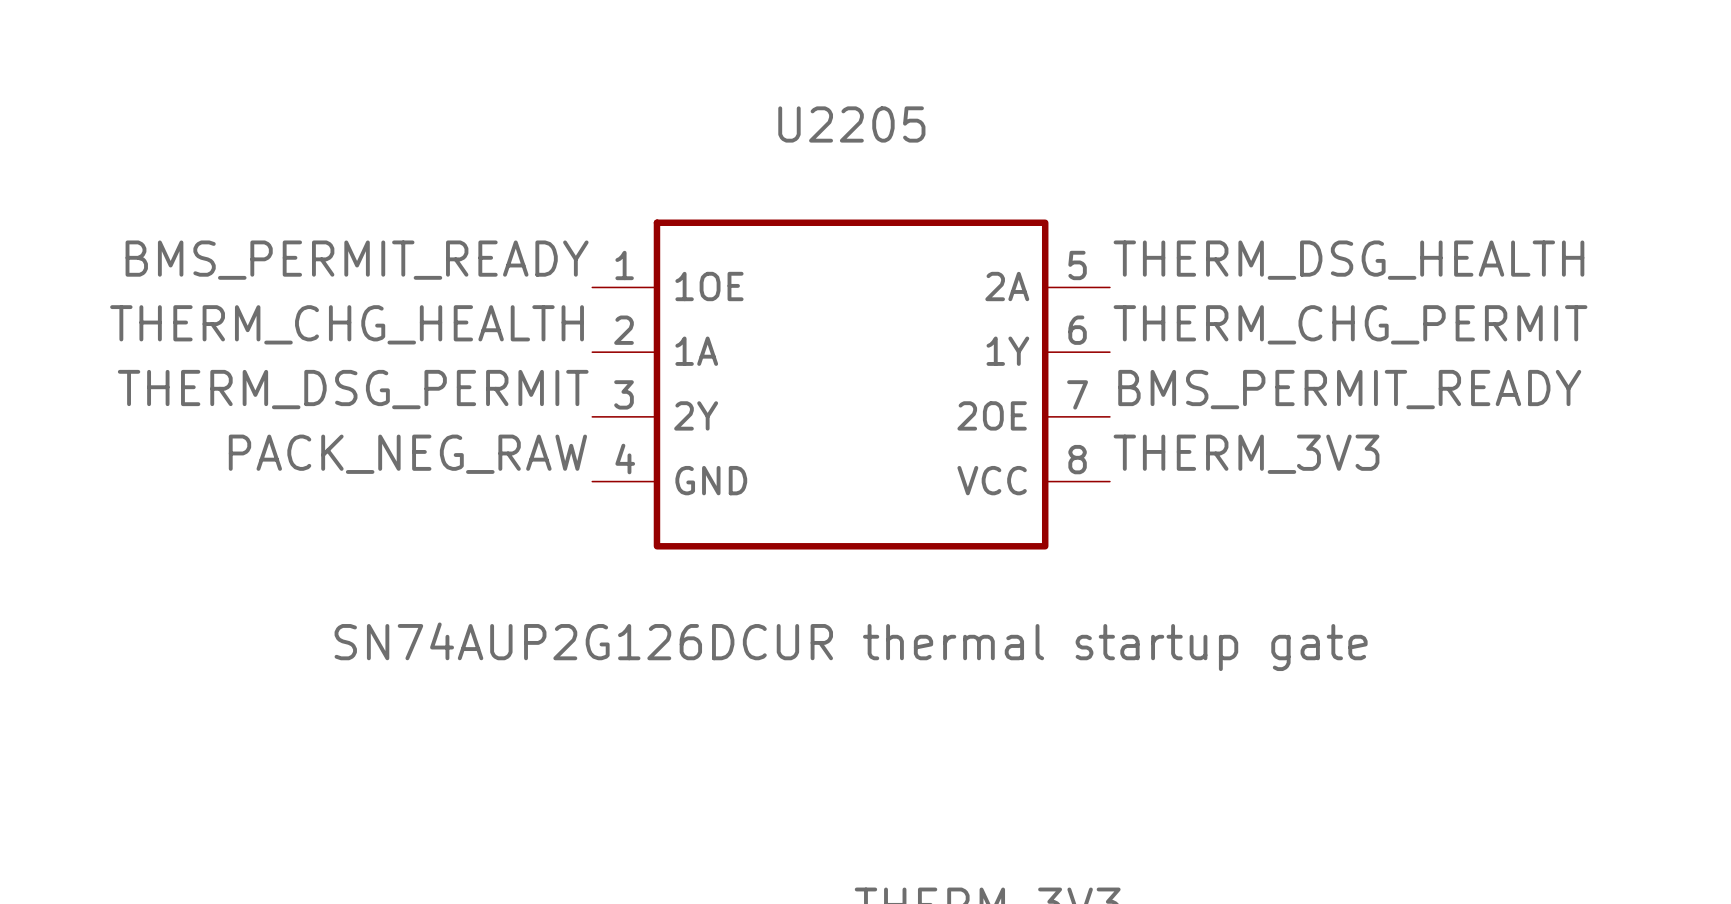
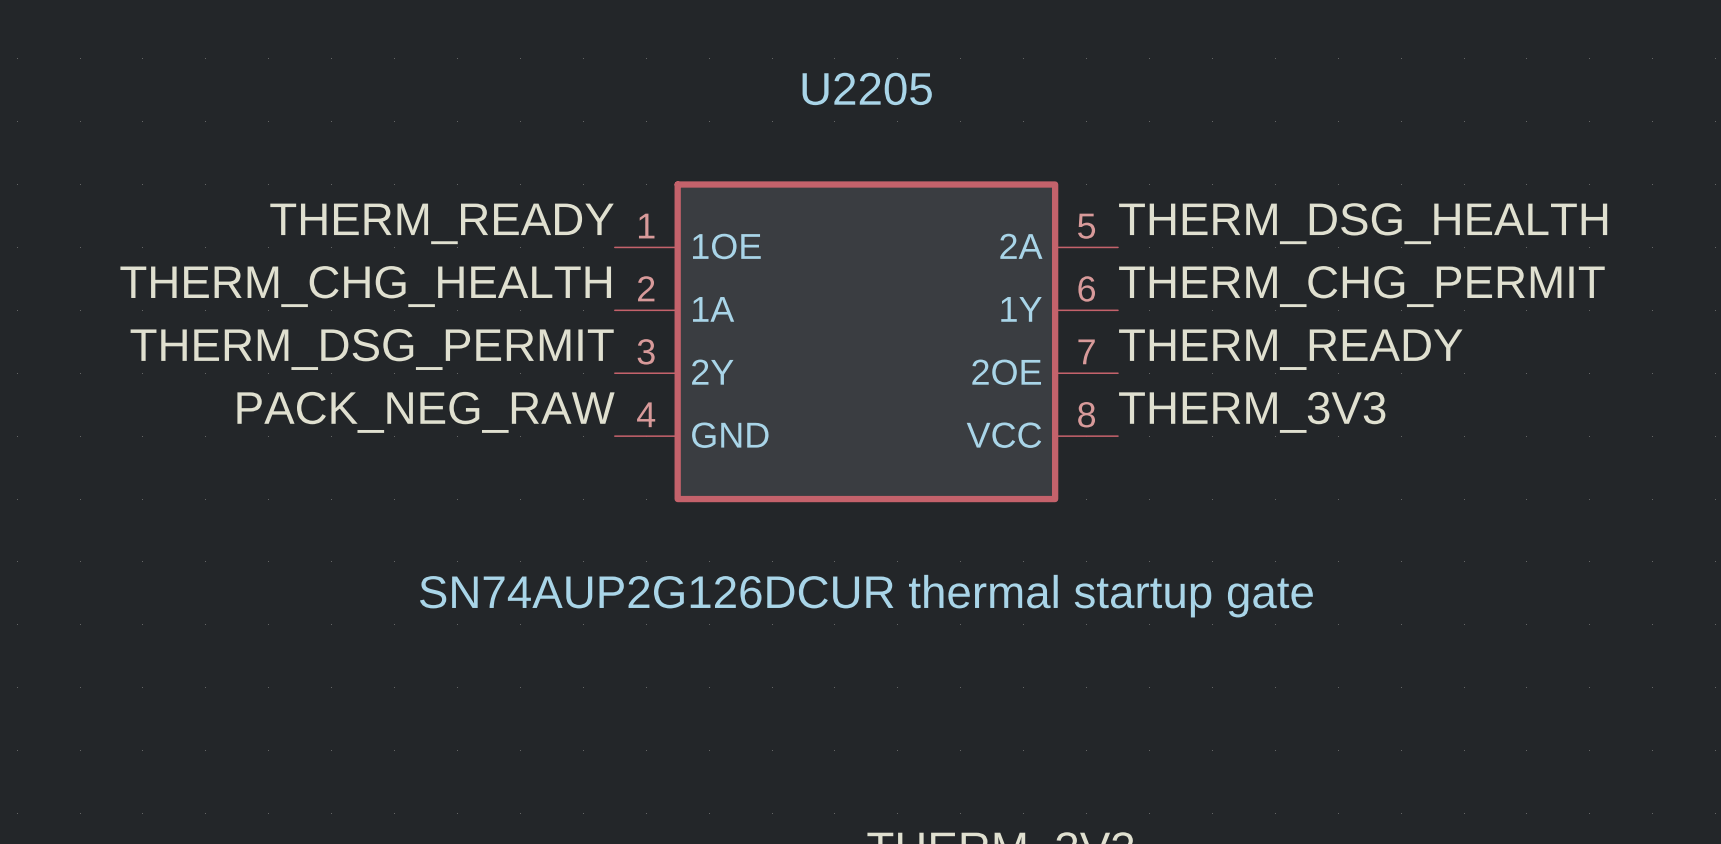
label: BMS_PERMIT_READY (357, 260) -> THERM_READY (442, 223)
label: BMS_PERMIT_READY (1349, 389) -> THERM_READY (1290, 349)

